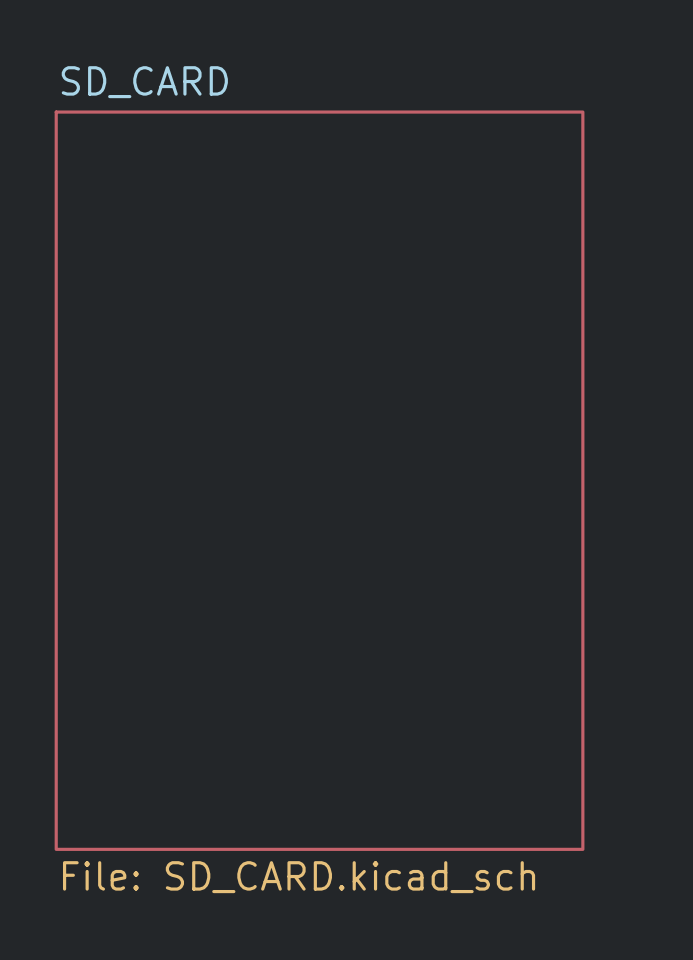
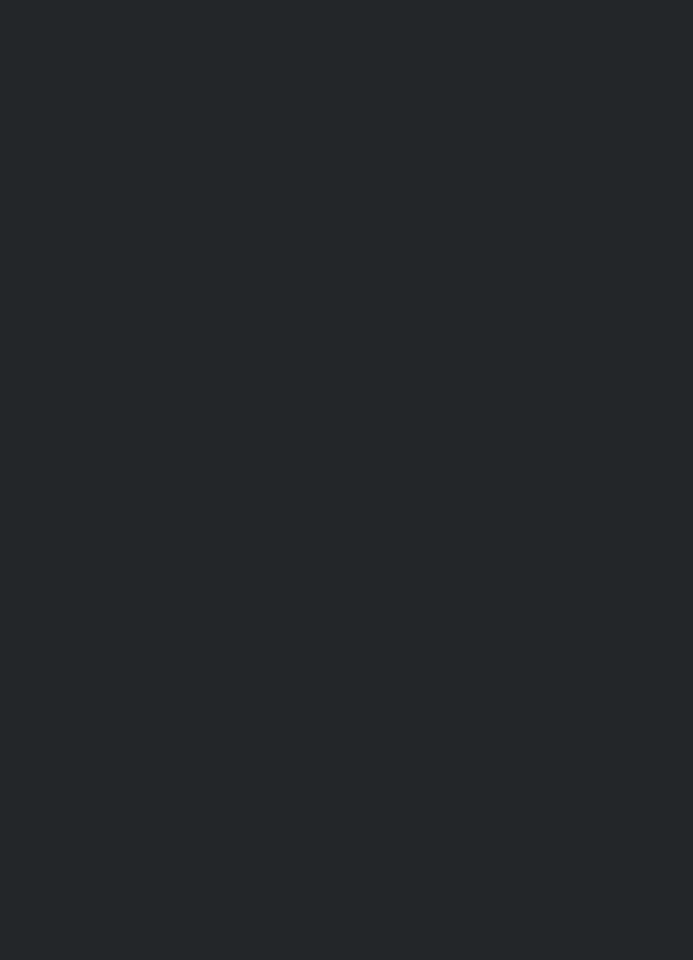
sheet SD_CARD: File: SD_CARD.kicad_sch (319, 480) -> none

